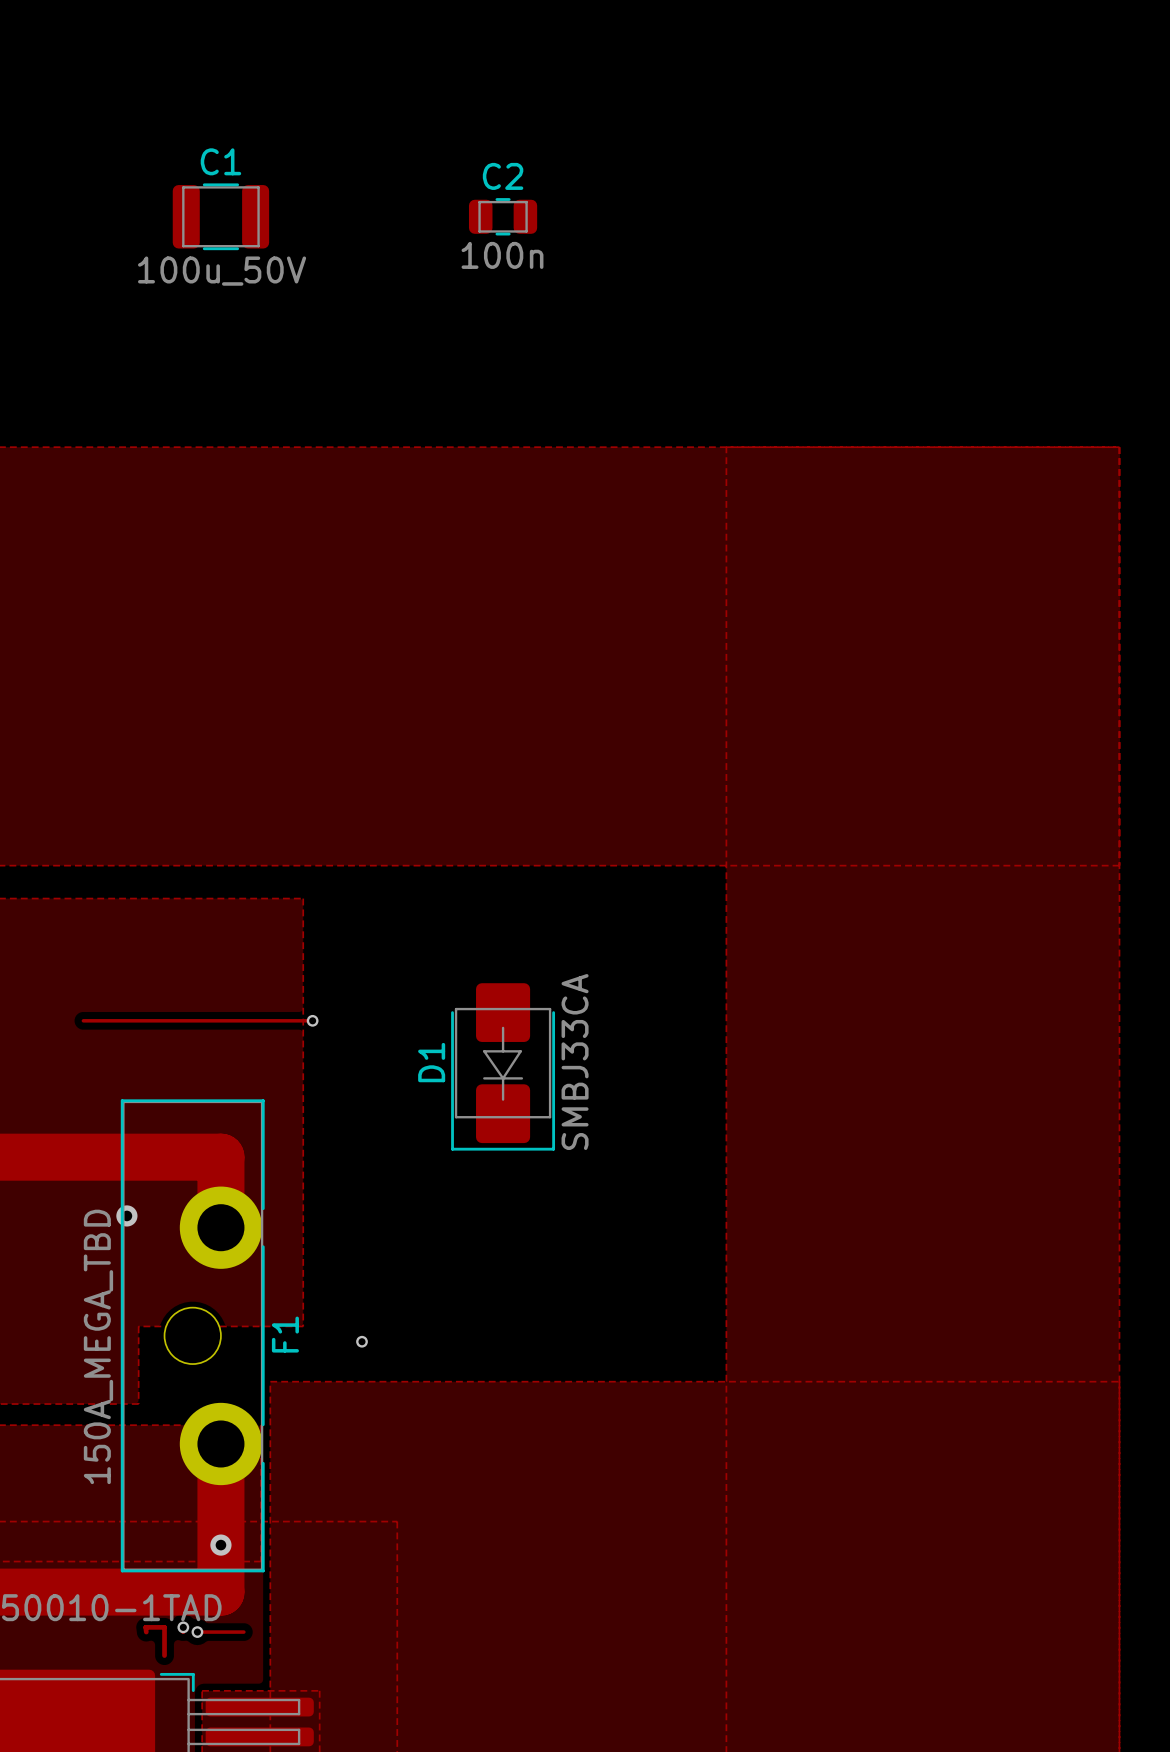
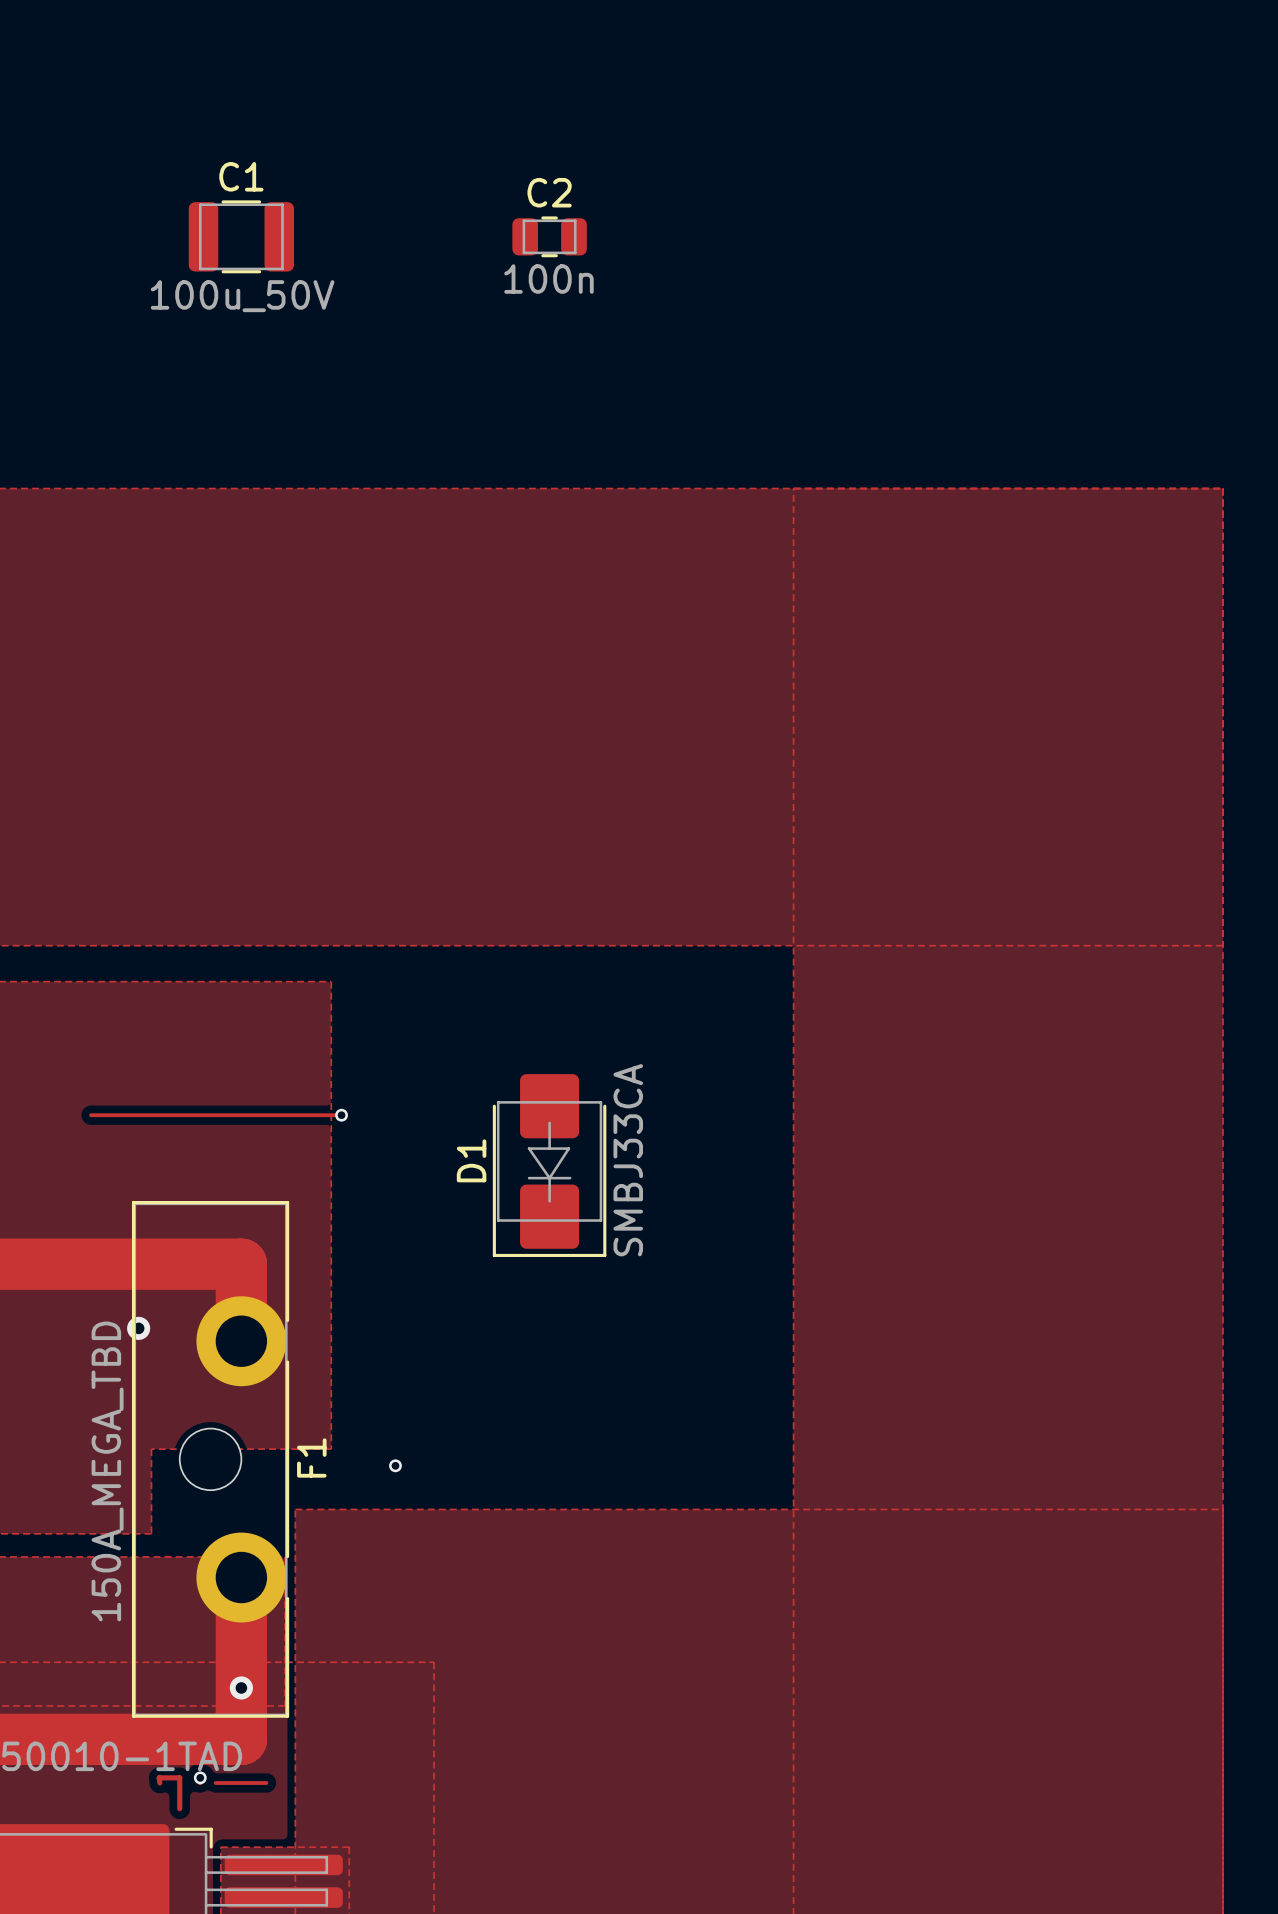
via: (197, 1632) -> none

